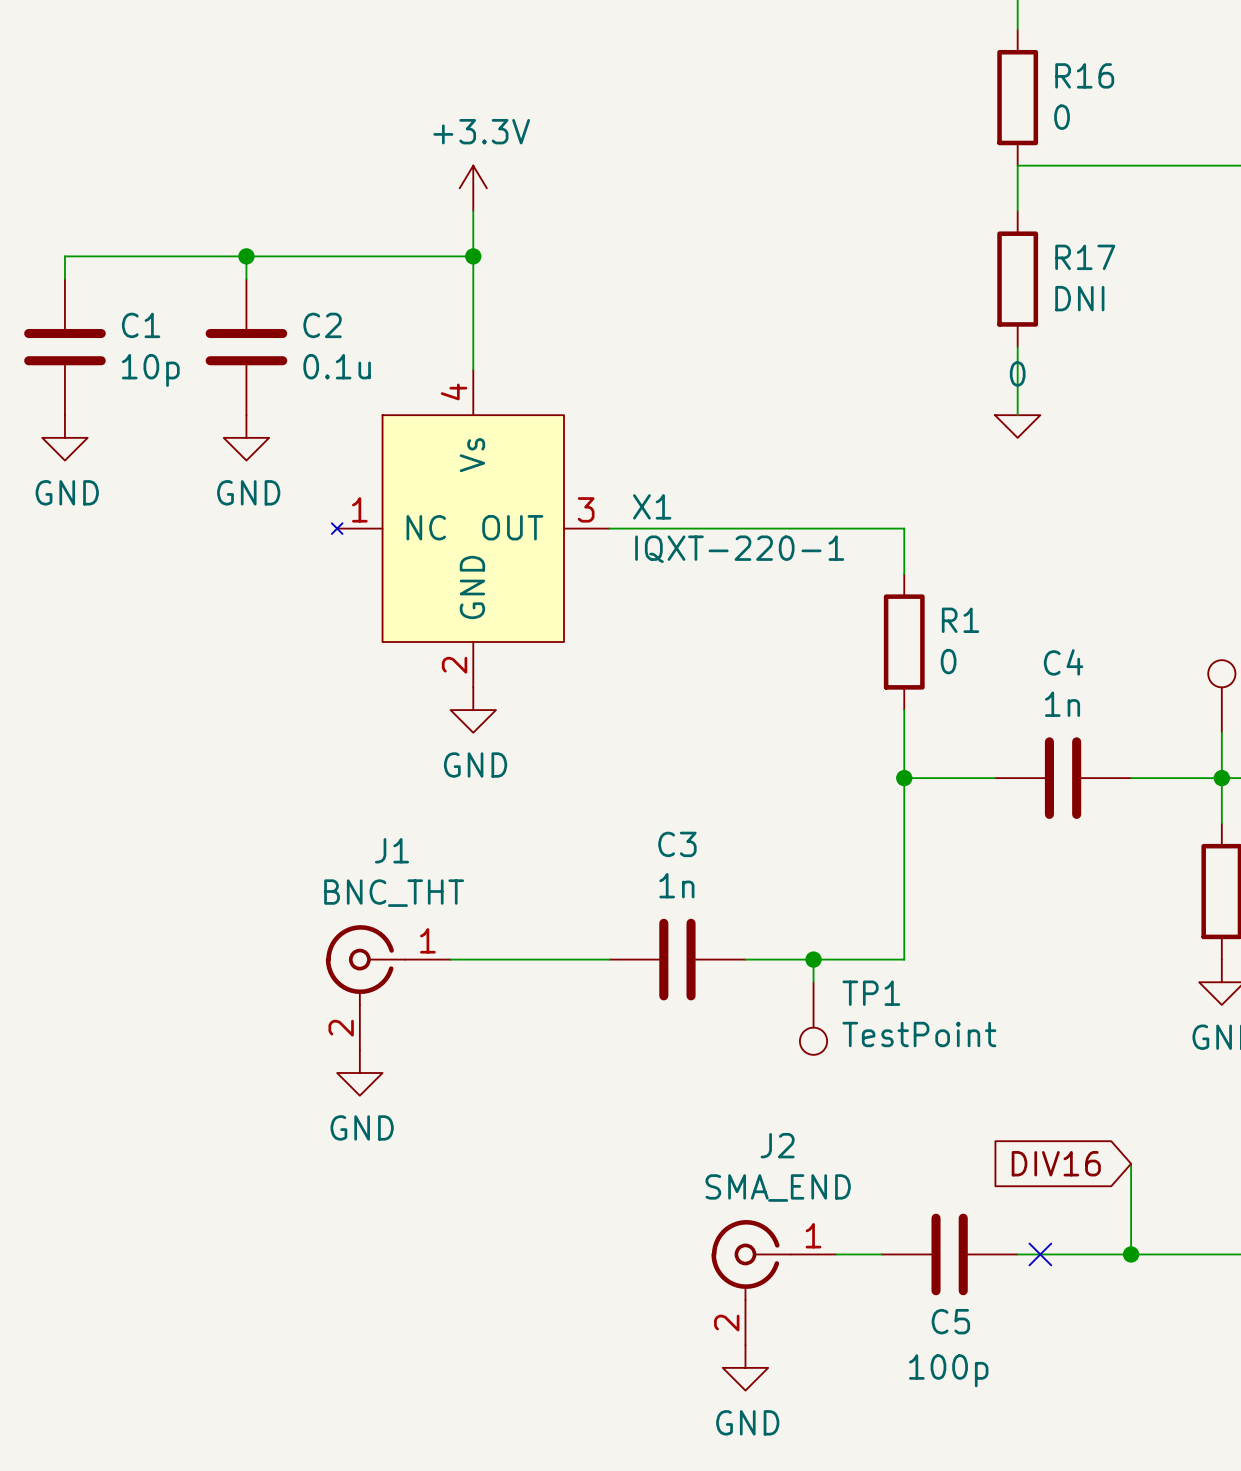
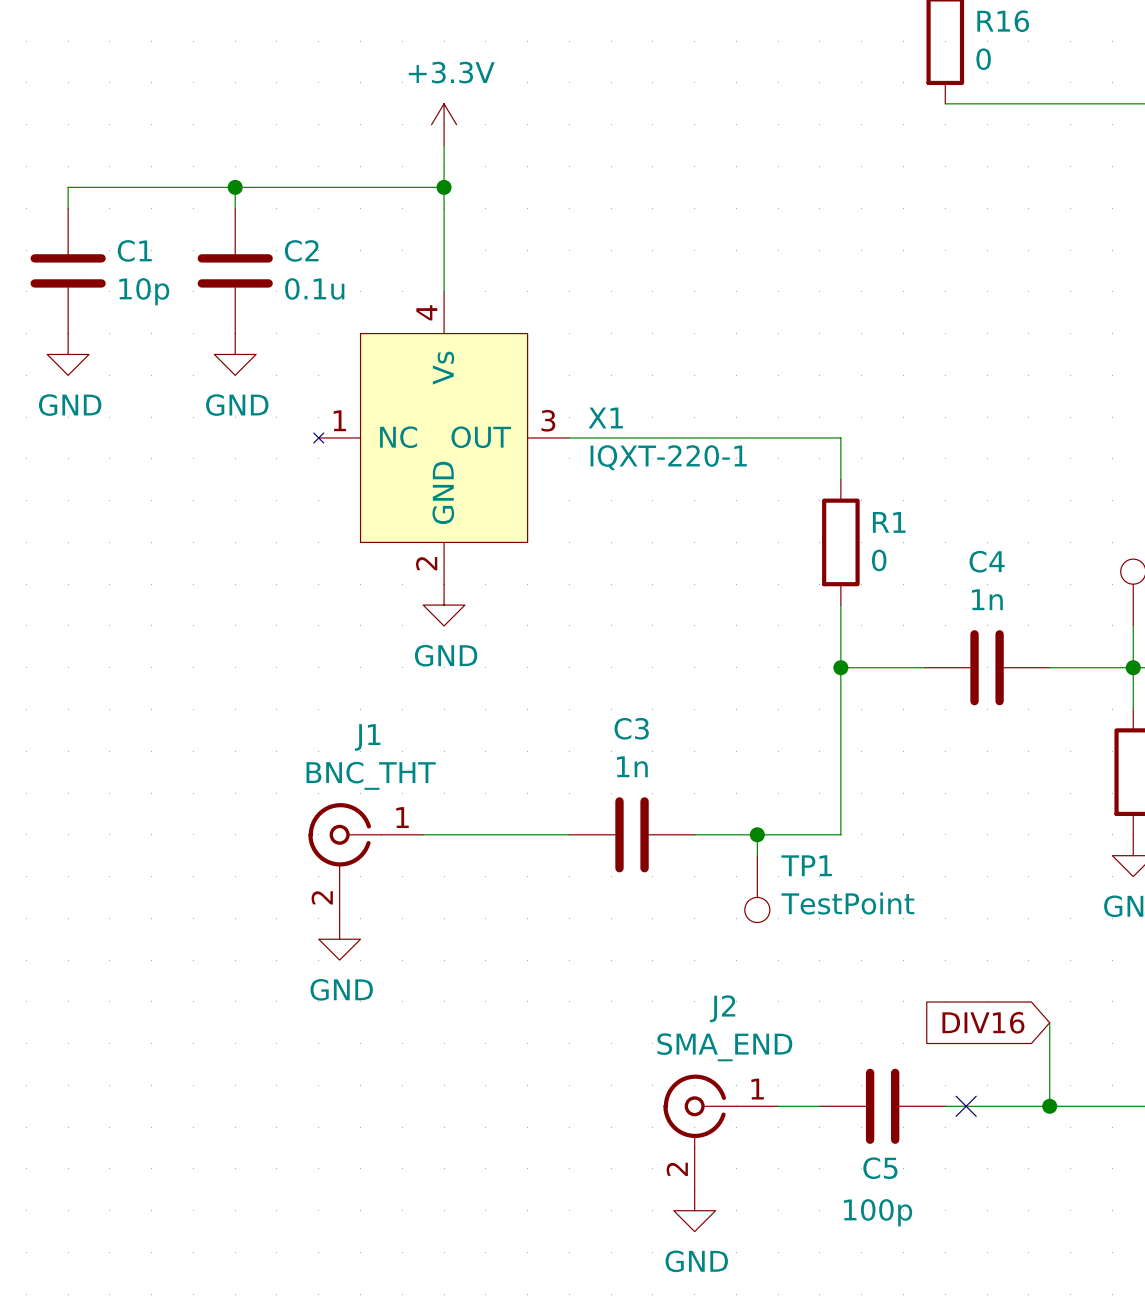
wire: (1017, 165) (1017, 211) -> none
R17: DNI (1017, 279) -> none
wire: (1017, 347) (1017, 415) -> none
power symbol: 0 (1017, 426) -> none

